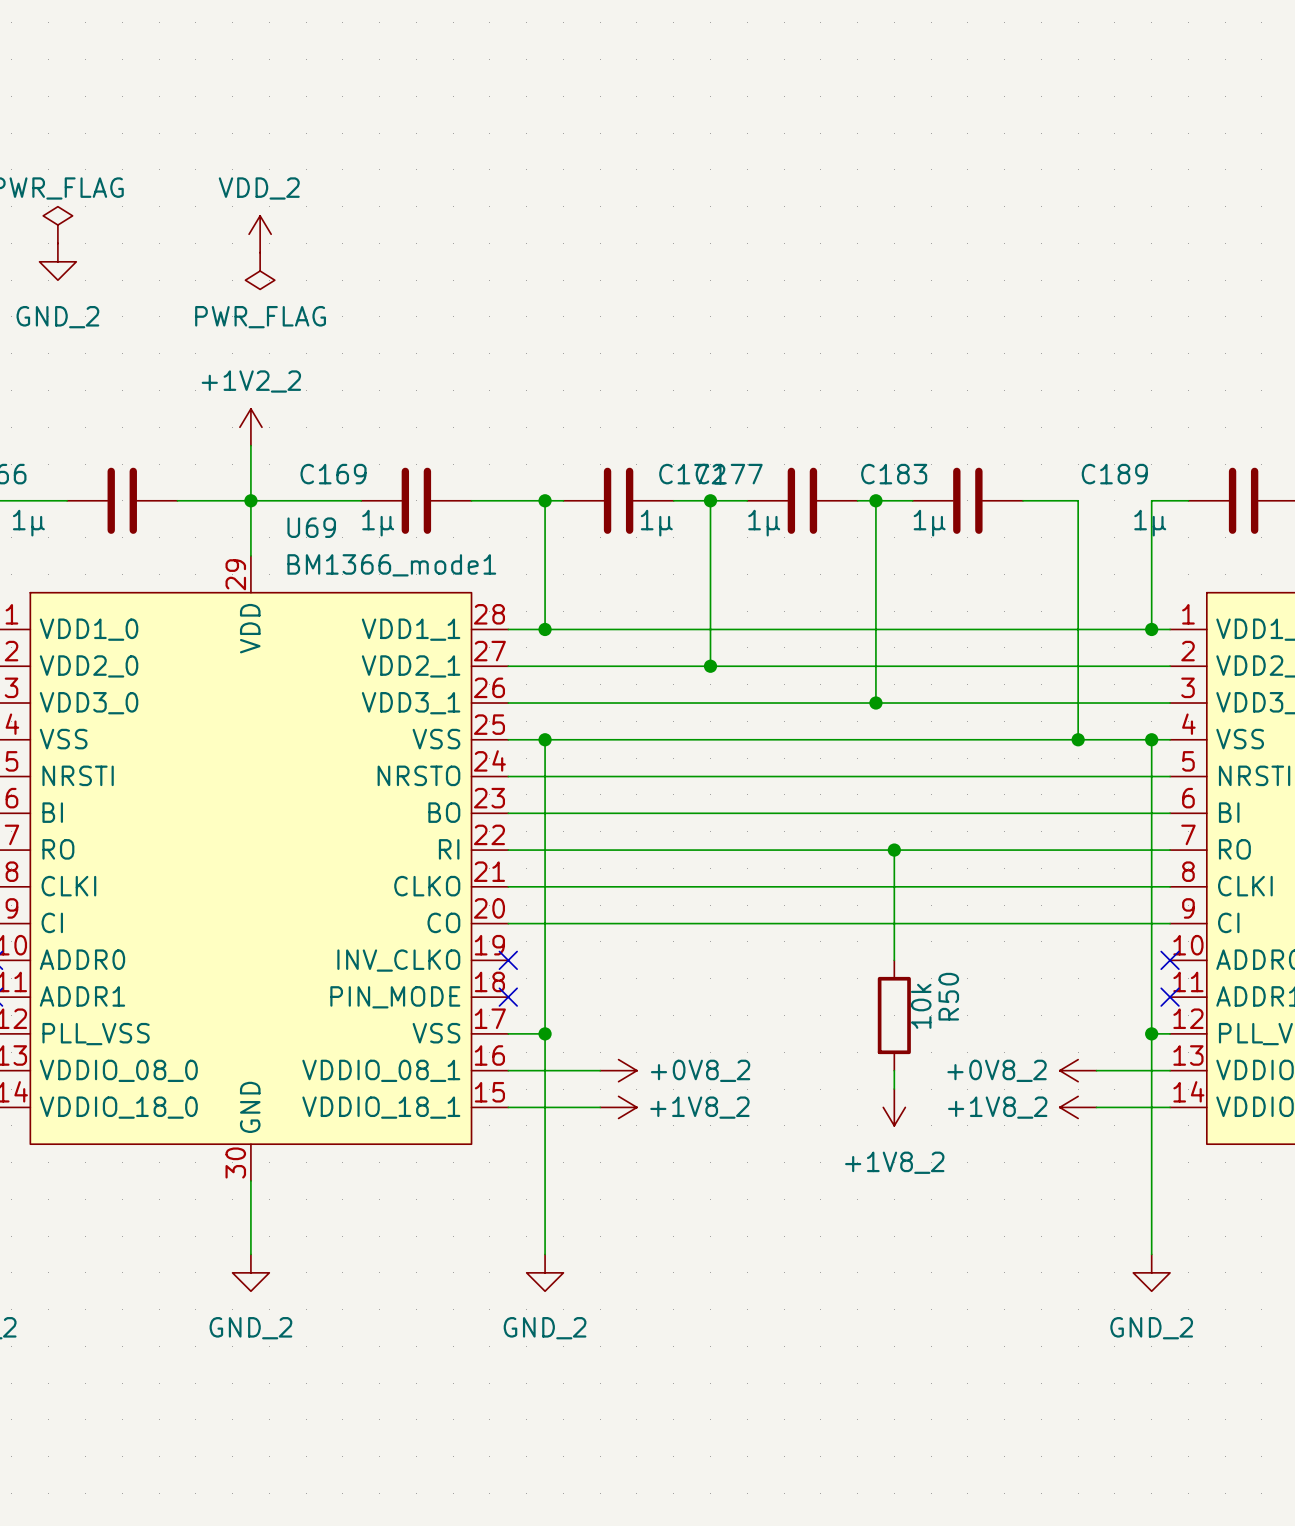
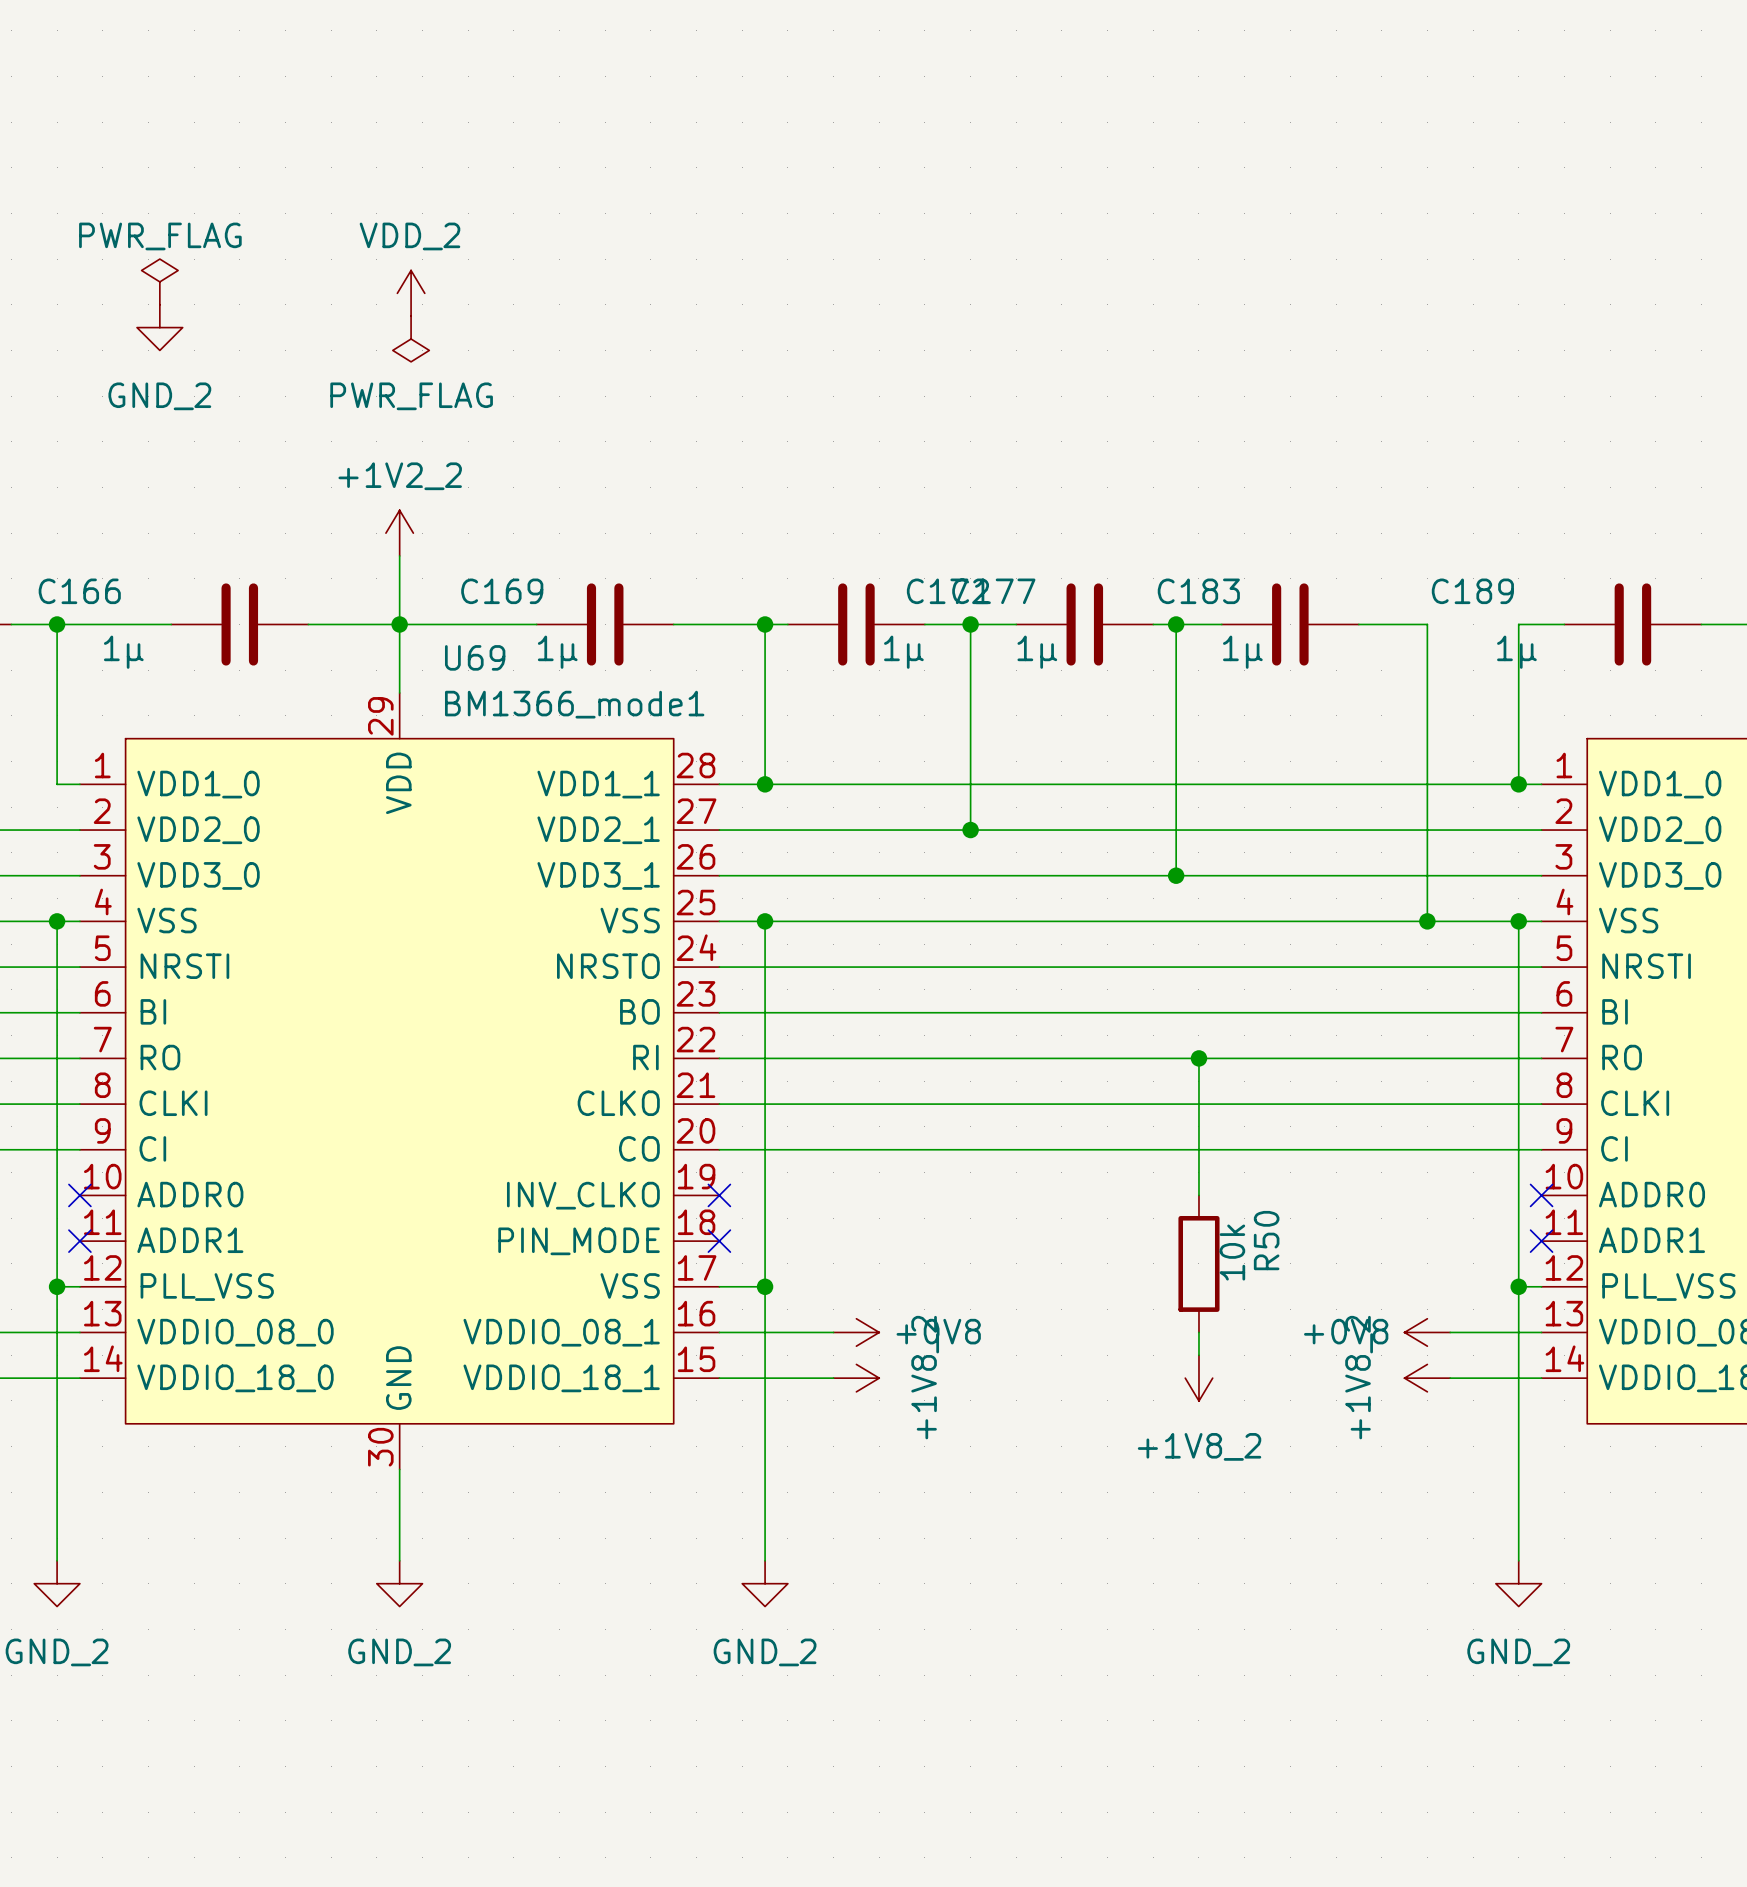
part value: +0V8_2 (700, 1070) -> +0V8 (938, 1331)
part value: +0V8_2 (997, 1070) -> +0V8 (1346, 1331)
power symbol text rotation: 0° (699, 1107) -> 90° counterclockwise (925, 1377)
power symbol text rotation: 0° (997, 1107) -> 90° counterclockwise (1359, 1377)

